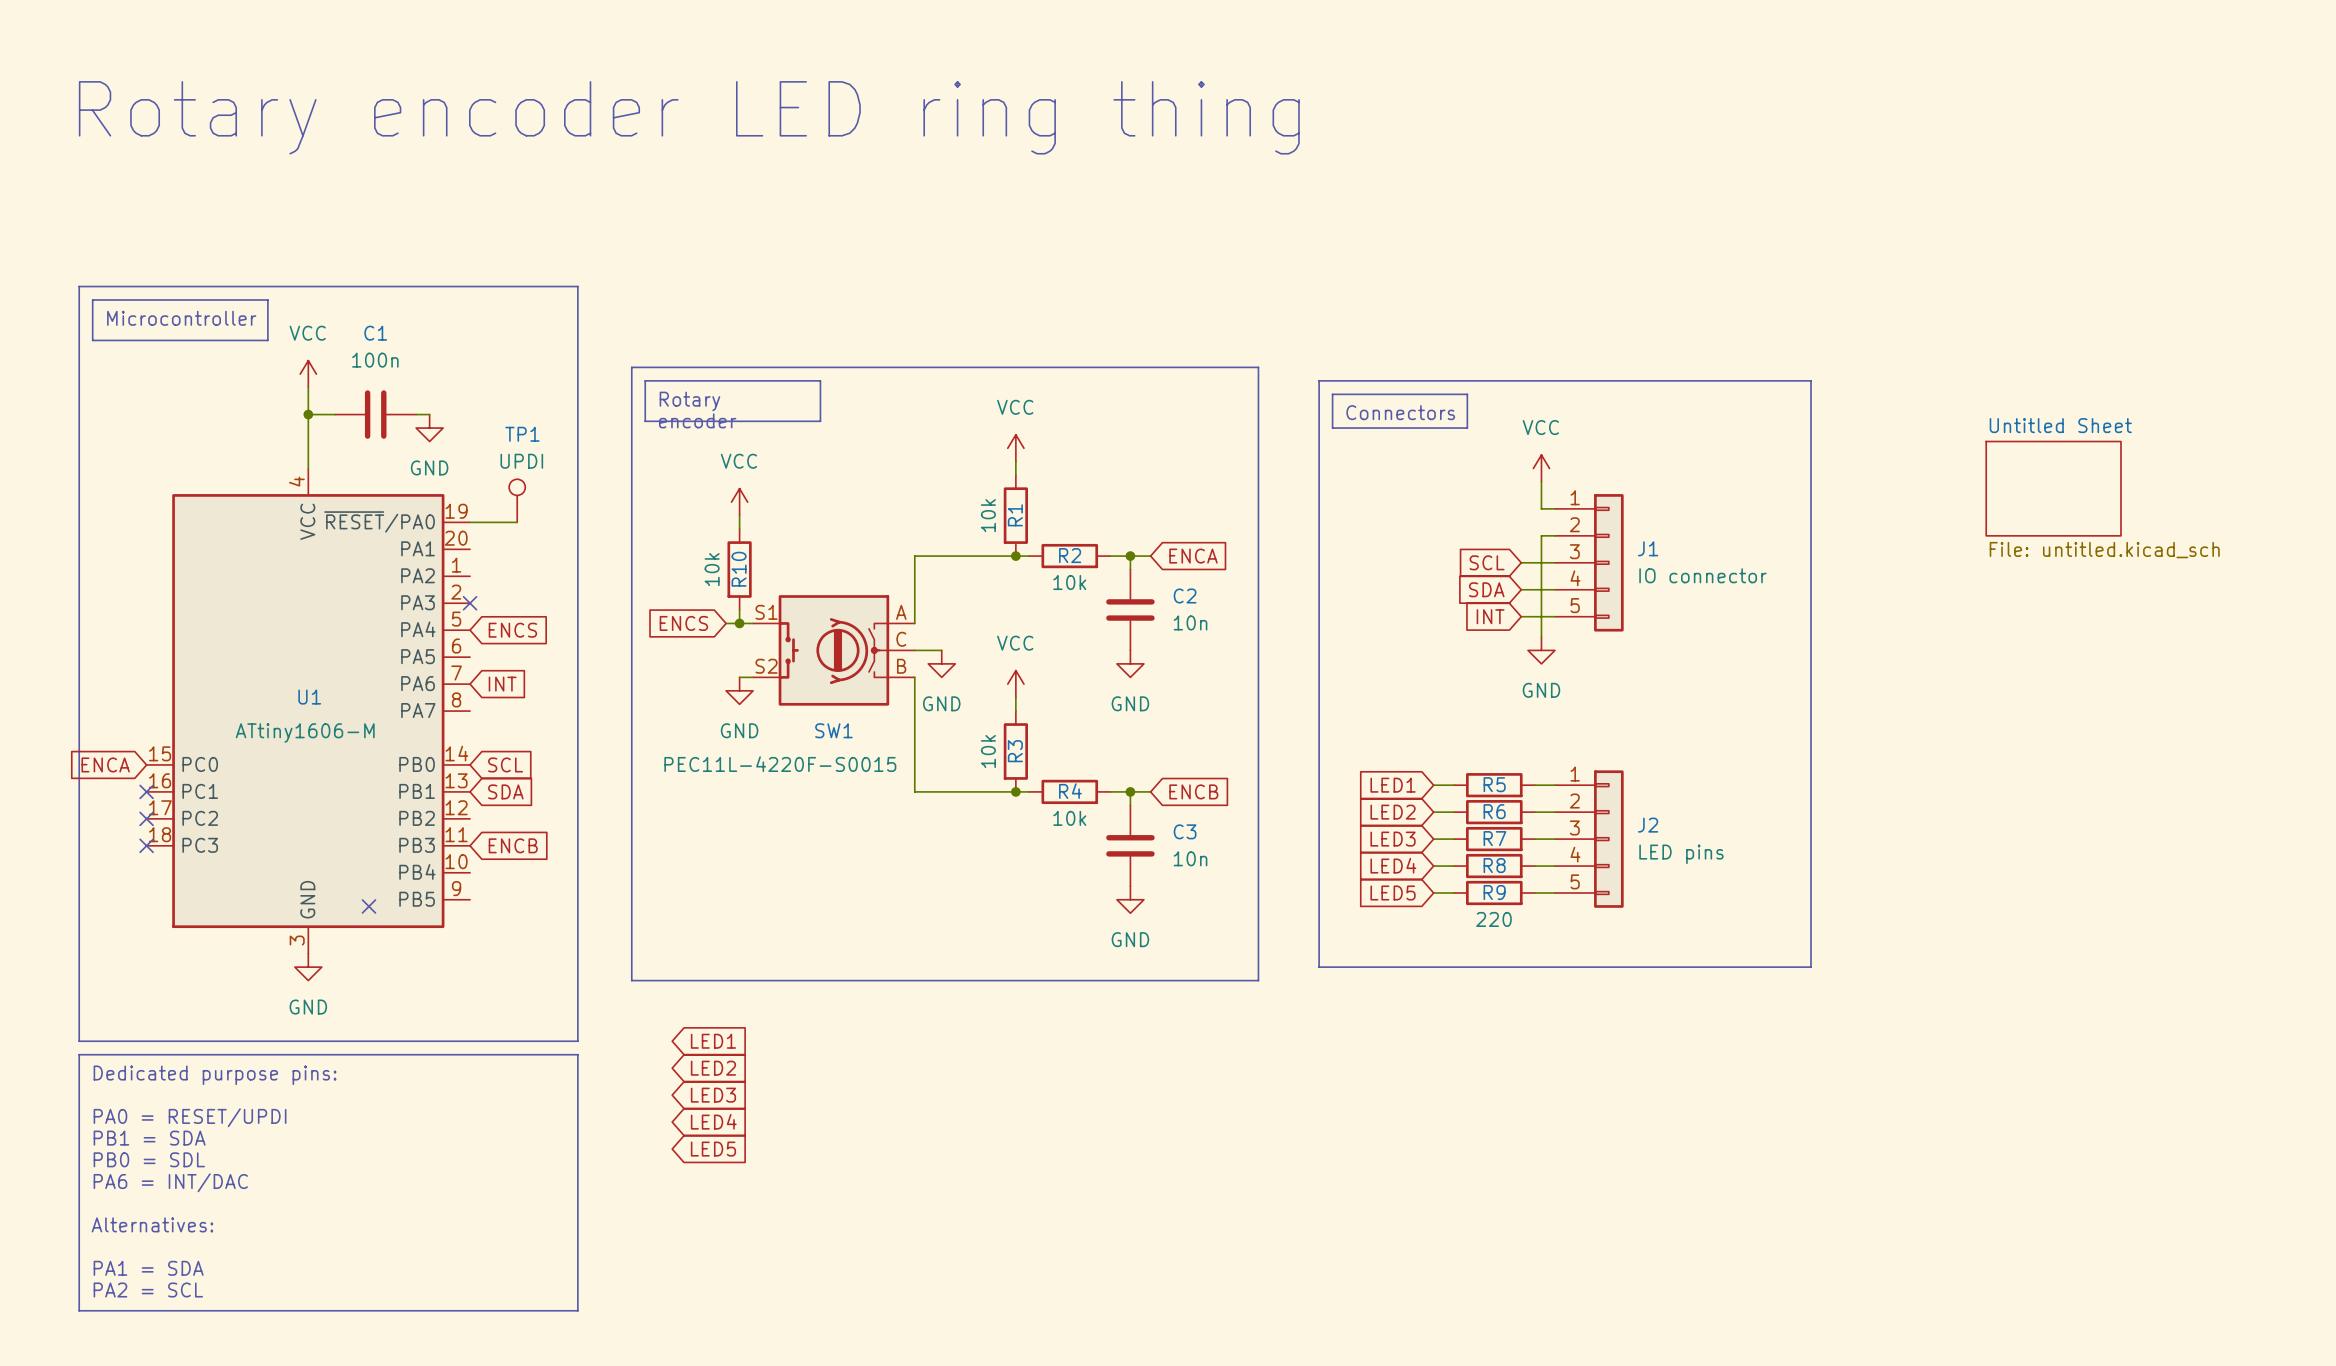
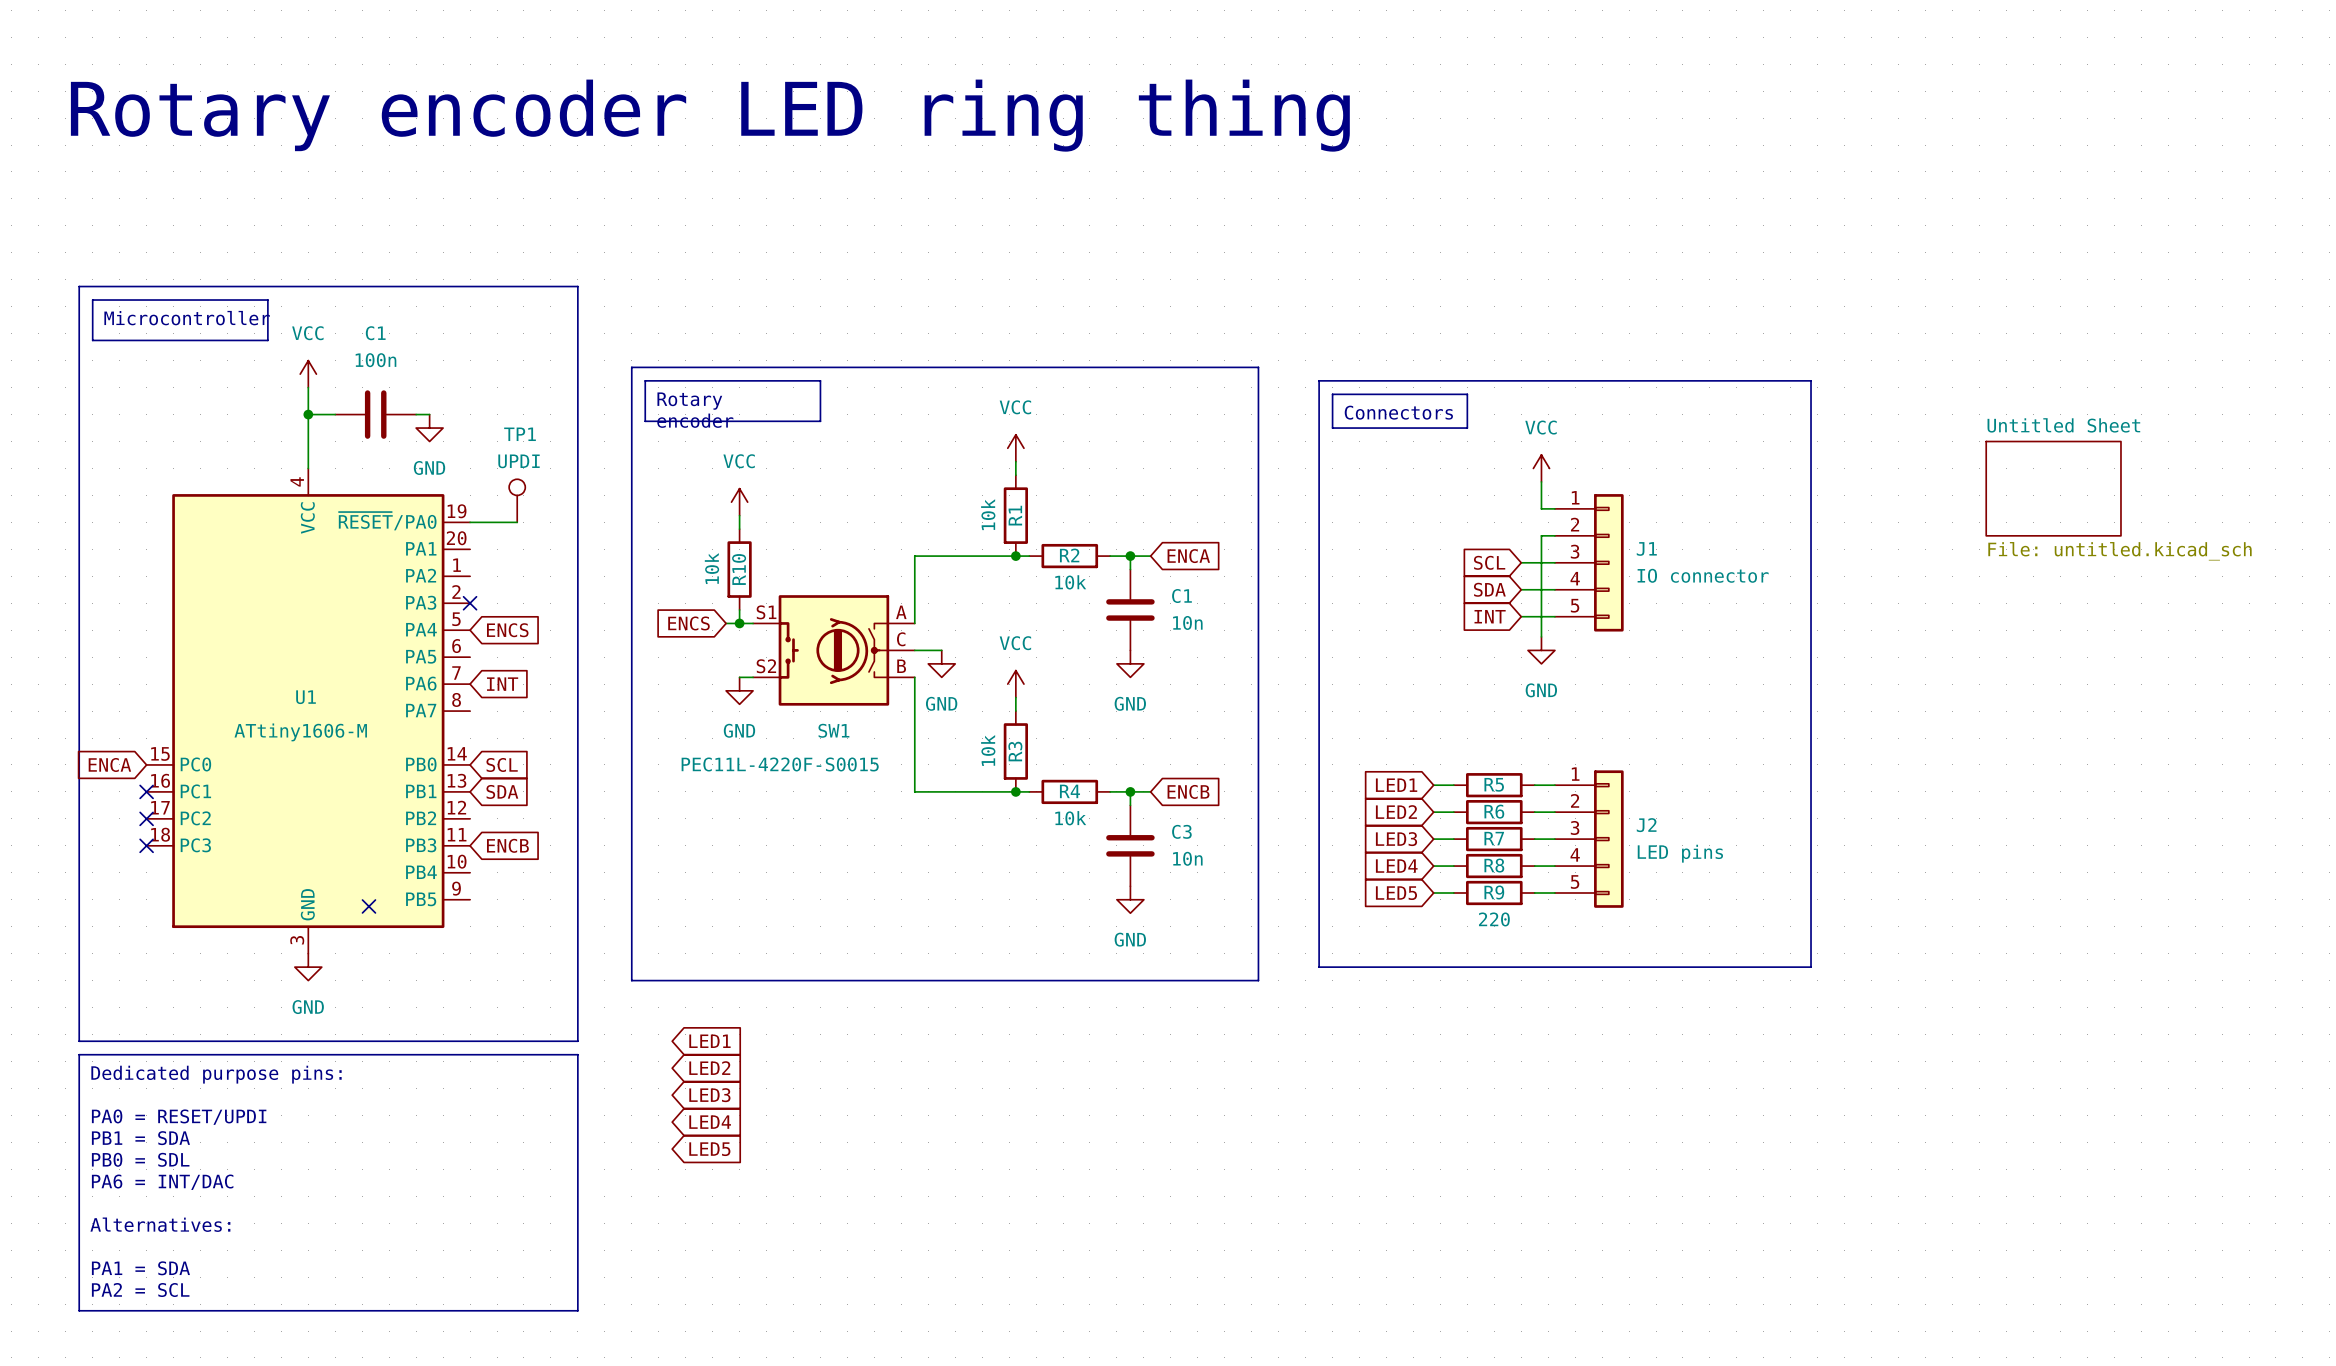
C2 name: C2 (1185, 596) -> C1 (1181, 596)

